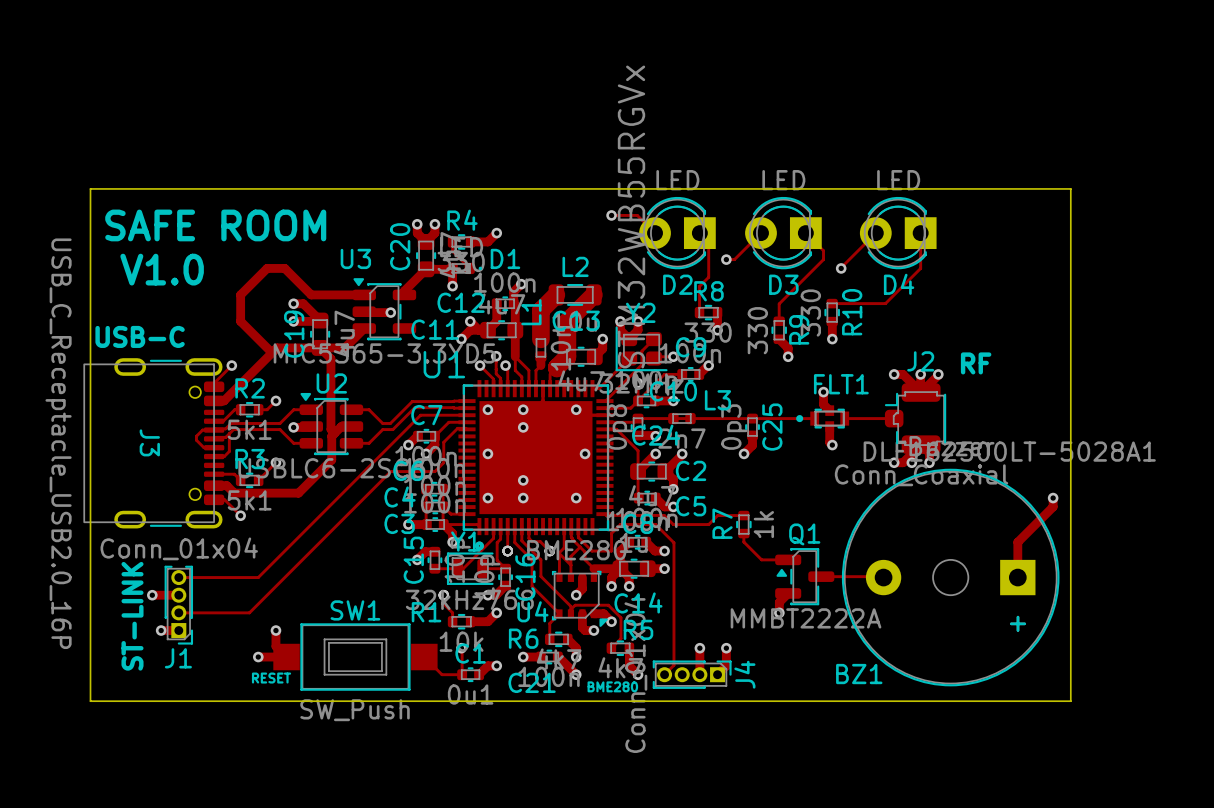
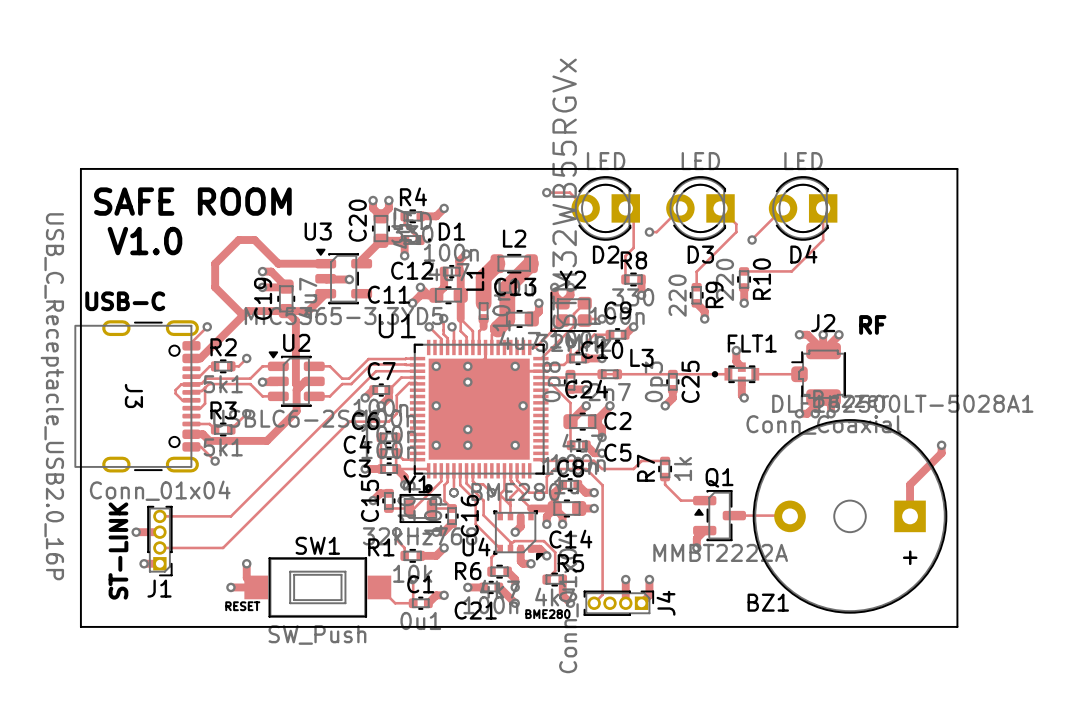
R10 value: 330 (810, 313) -> 220 (724, 279)
R9 value: 330 (757, 330) -> 220 (677, 295)

